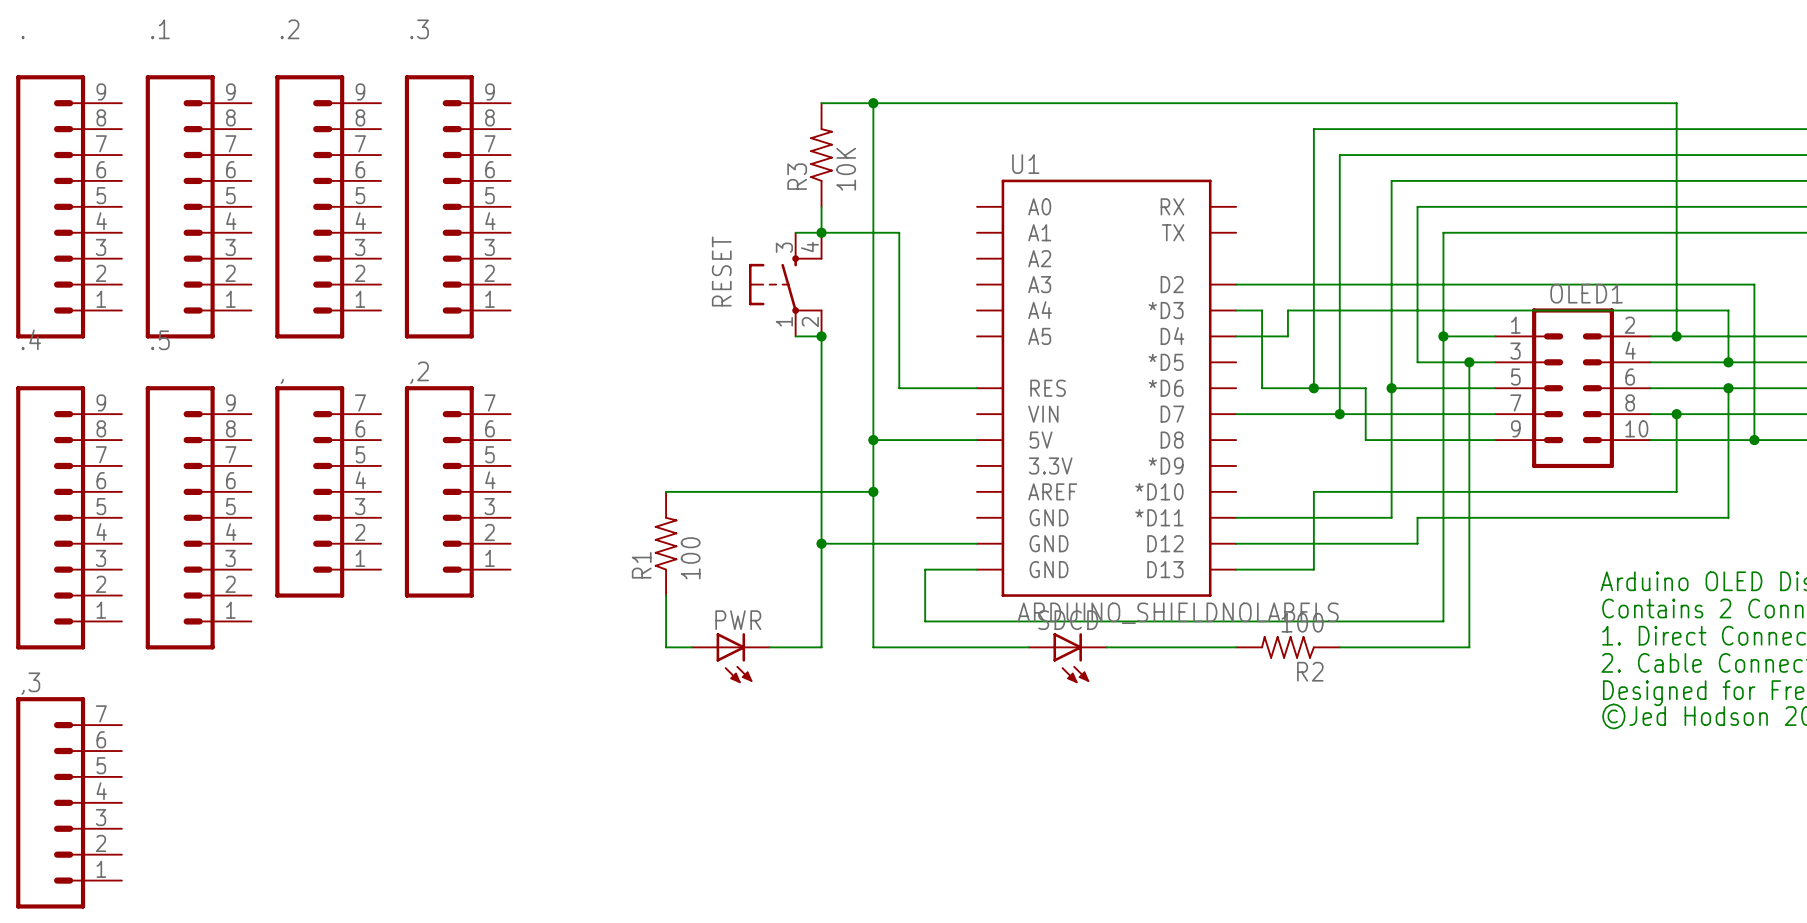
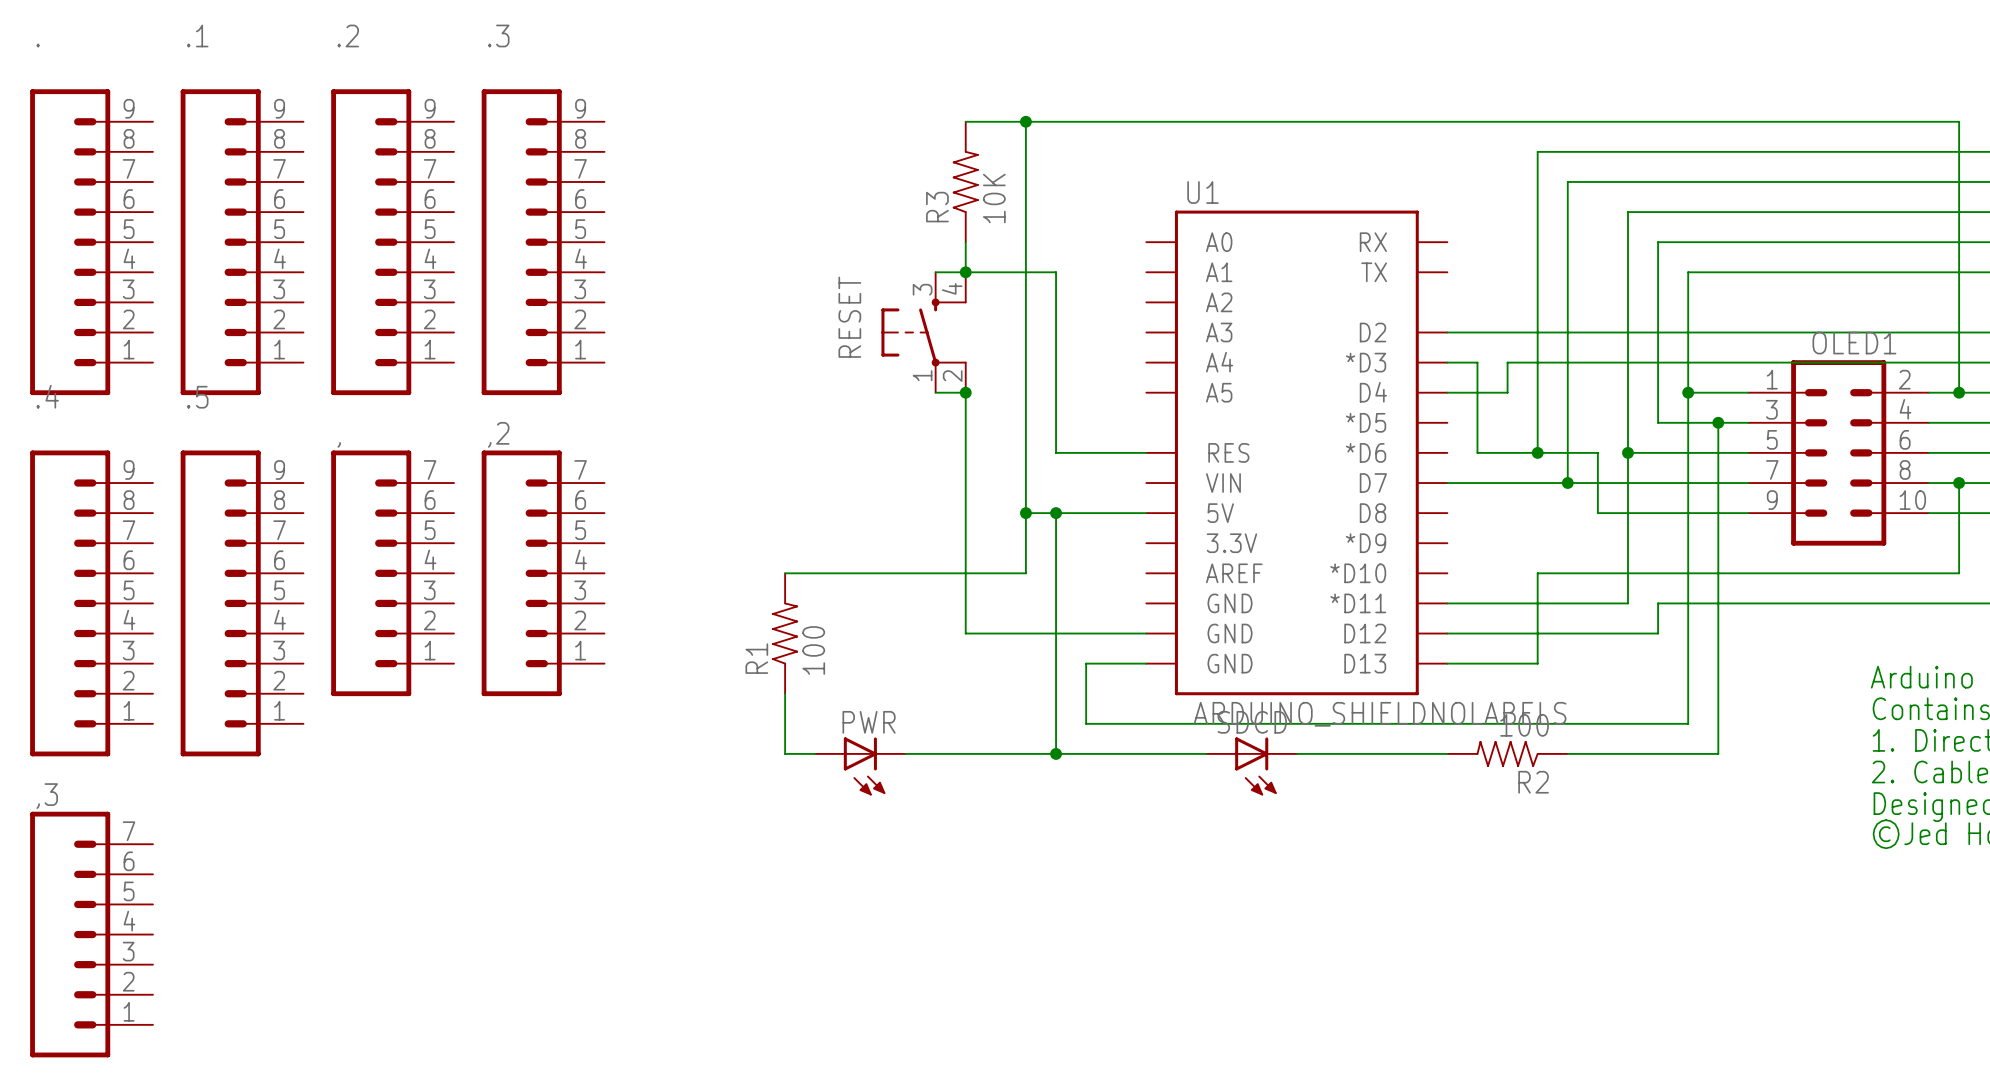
wire: none -> (1056, 513) (1056, 753)
wire: (873, 491) (873, 647) -> none
junction position: (873, 491) -> (1056, 513)
wire: (821, 543) (821, 647) -> (1025, 753) (965, 753)
junction: (821, 543) -> none
junction: none -> (1056, 753)

